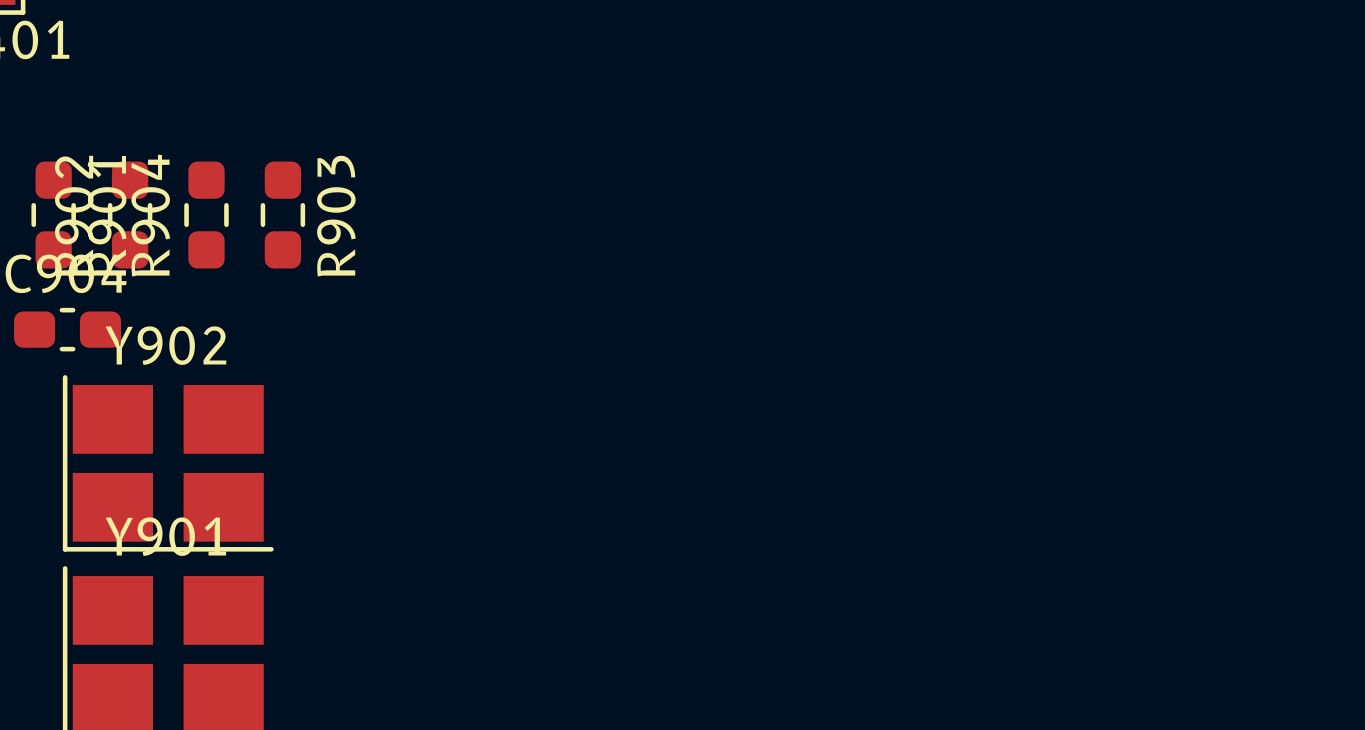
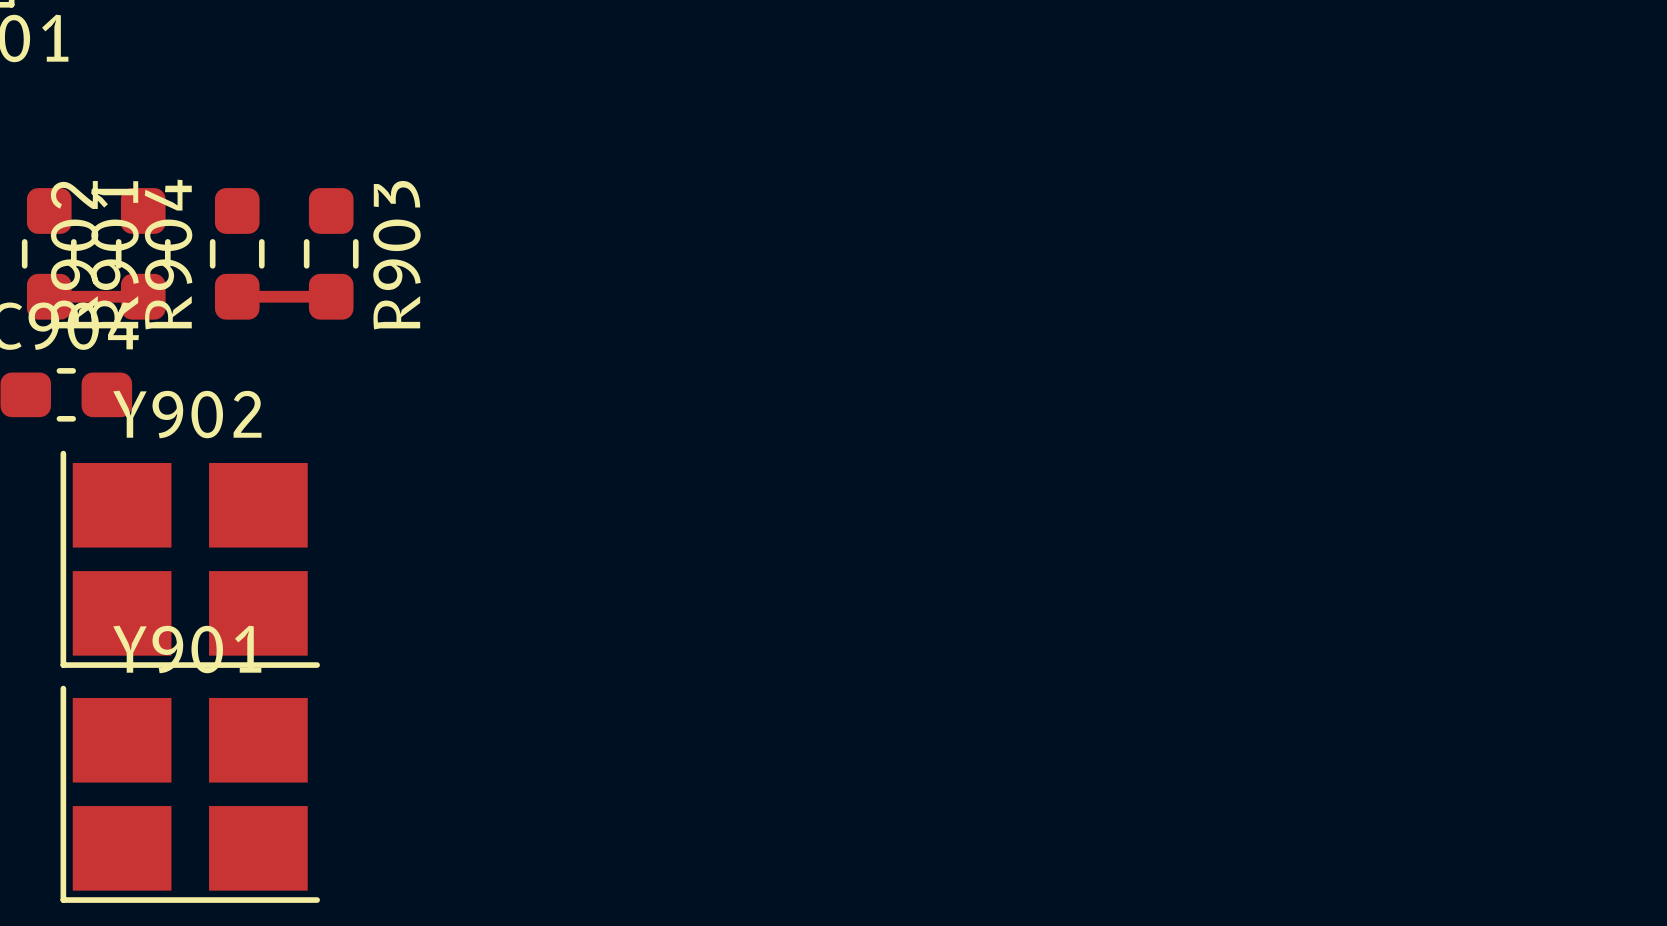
top track: none -> (49, 296) (143, 296)
top track: none -> (237, 296) (331, 296)

